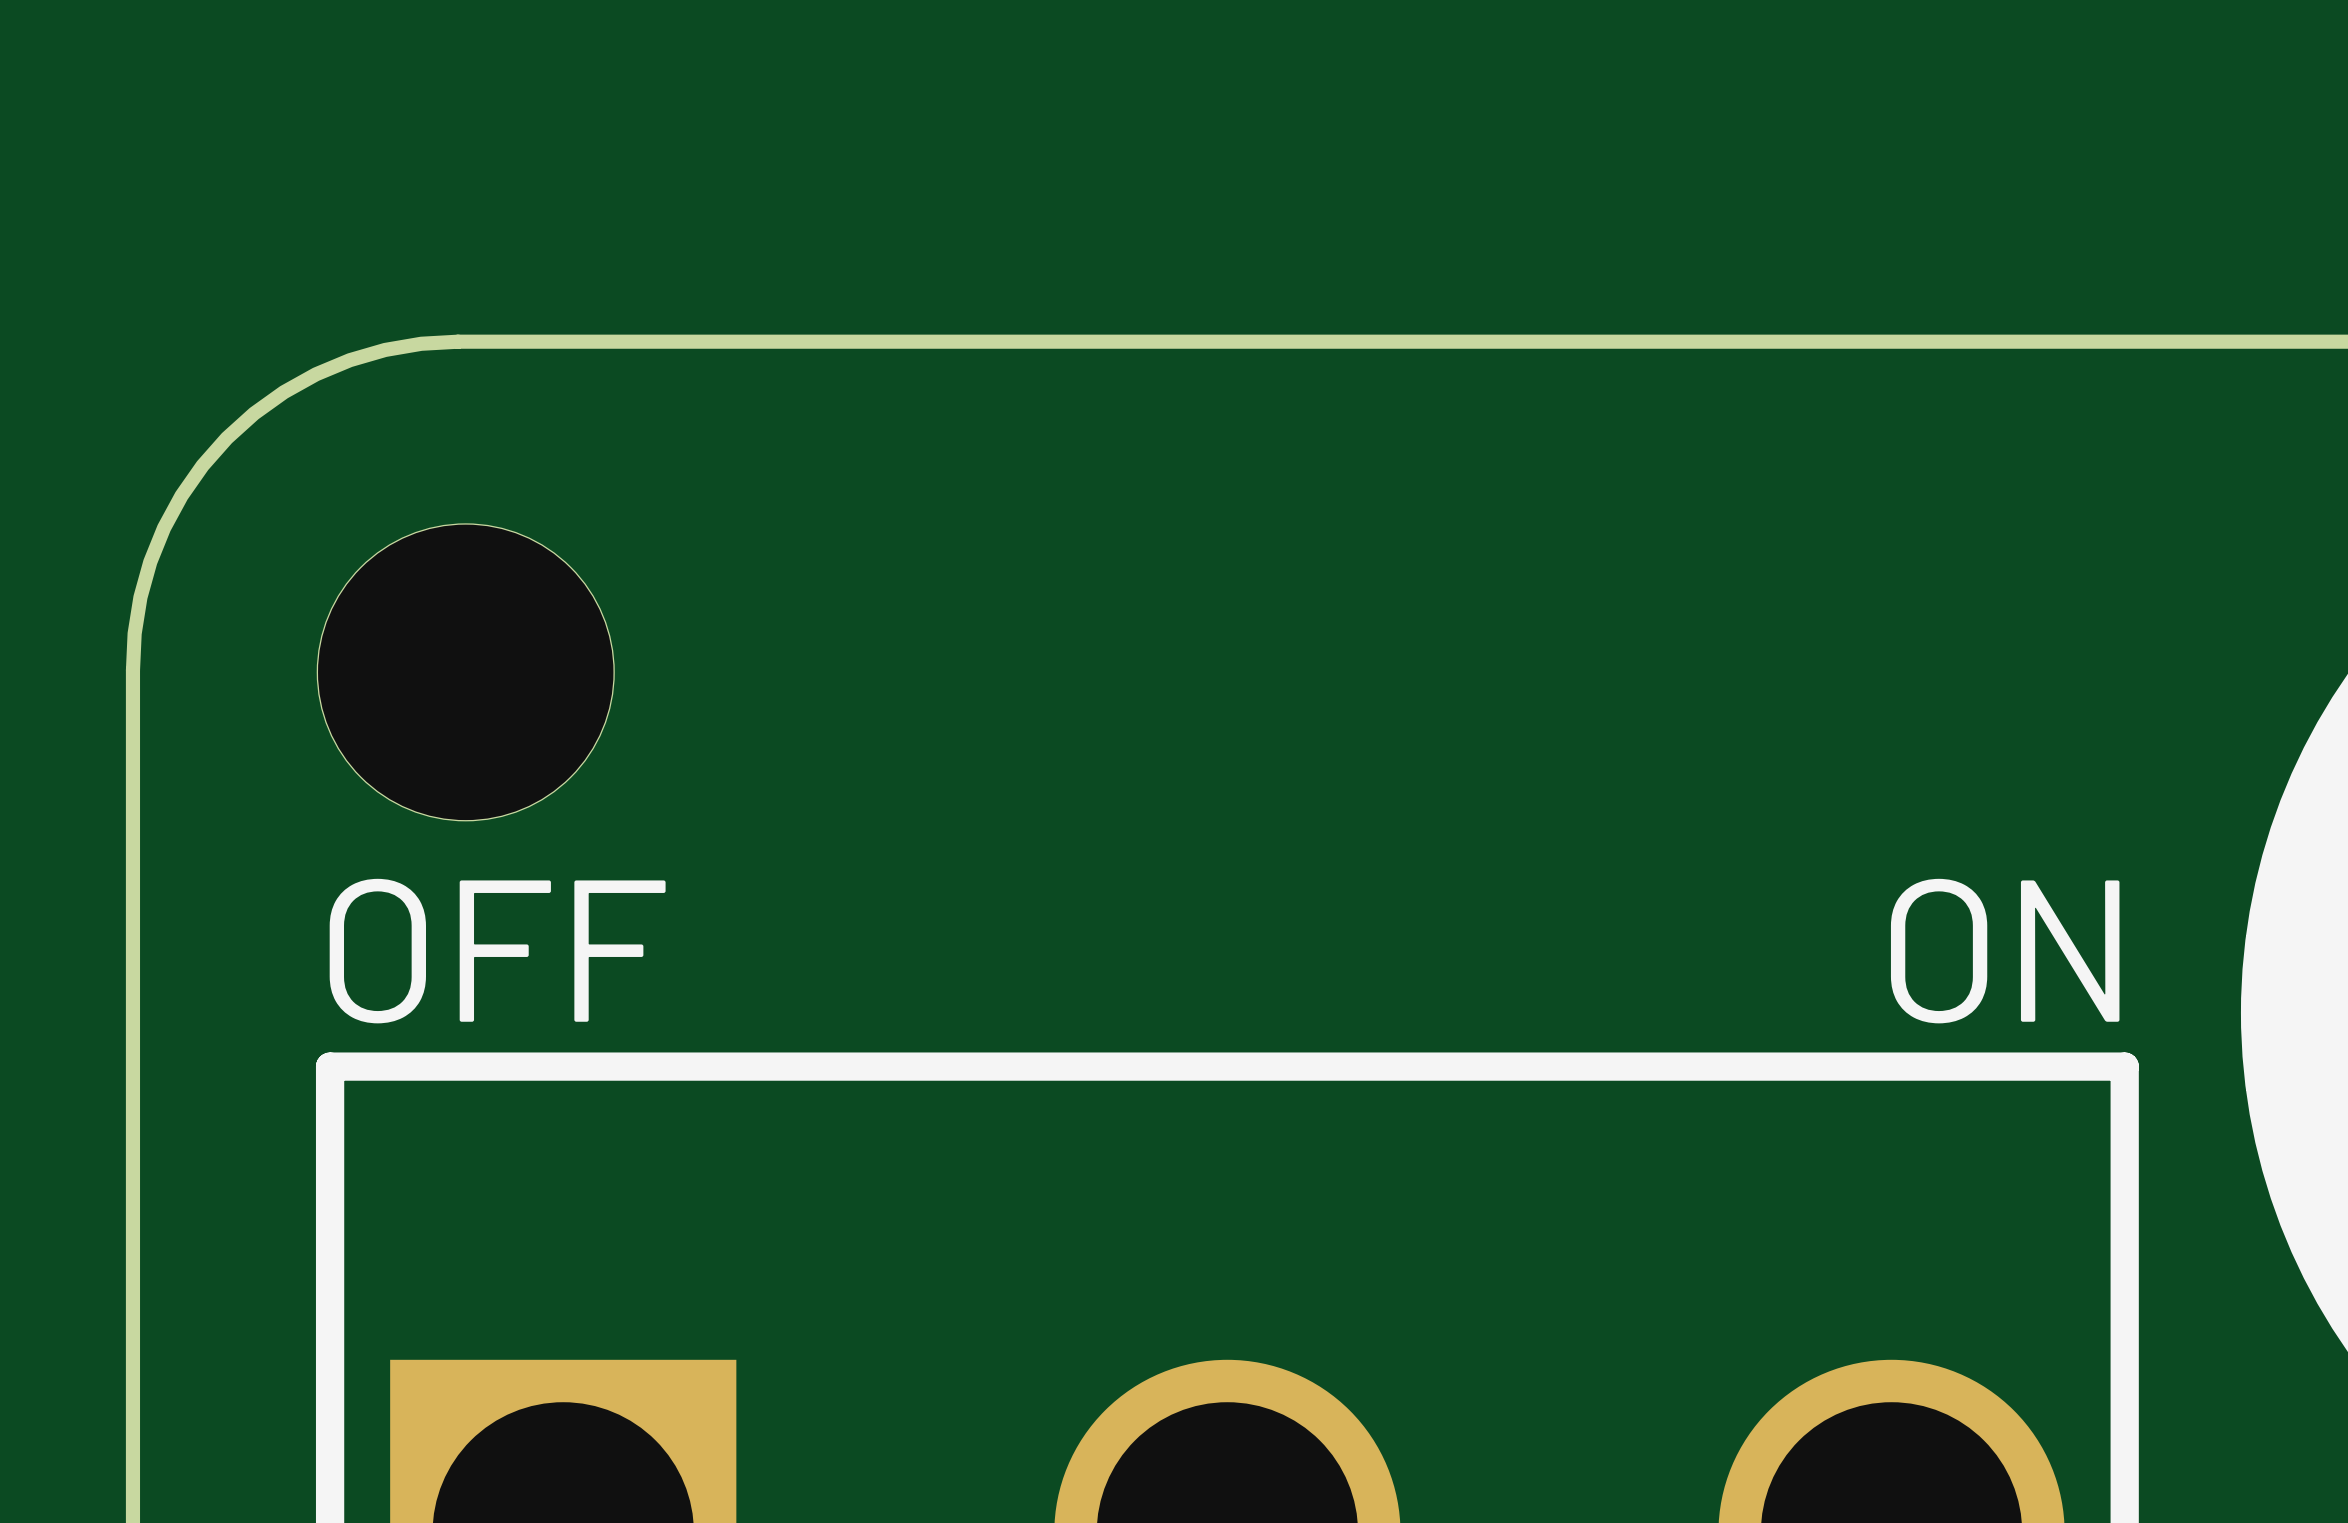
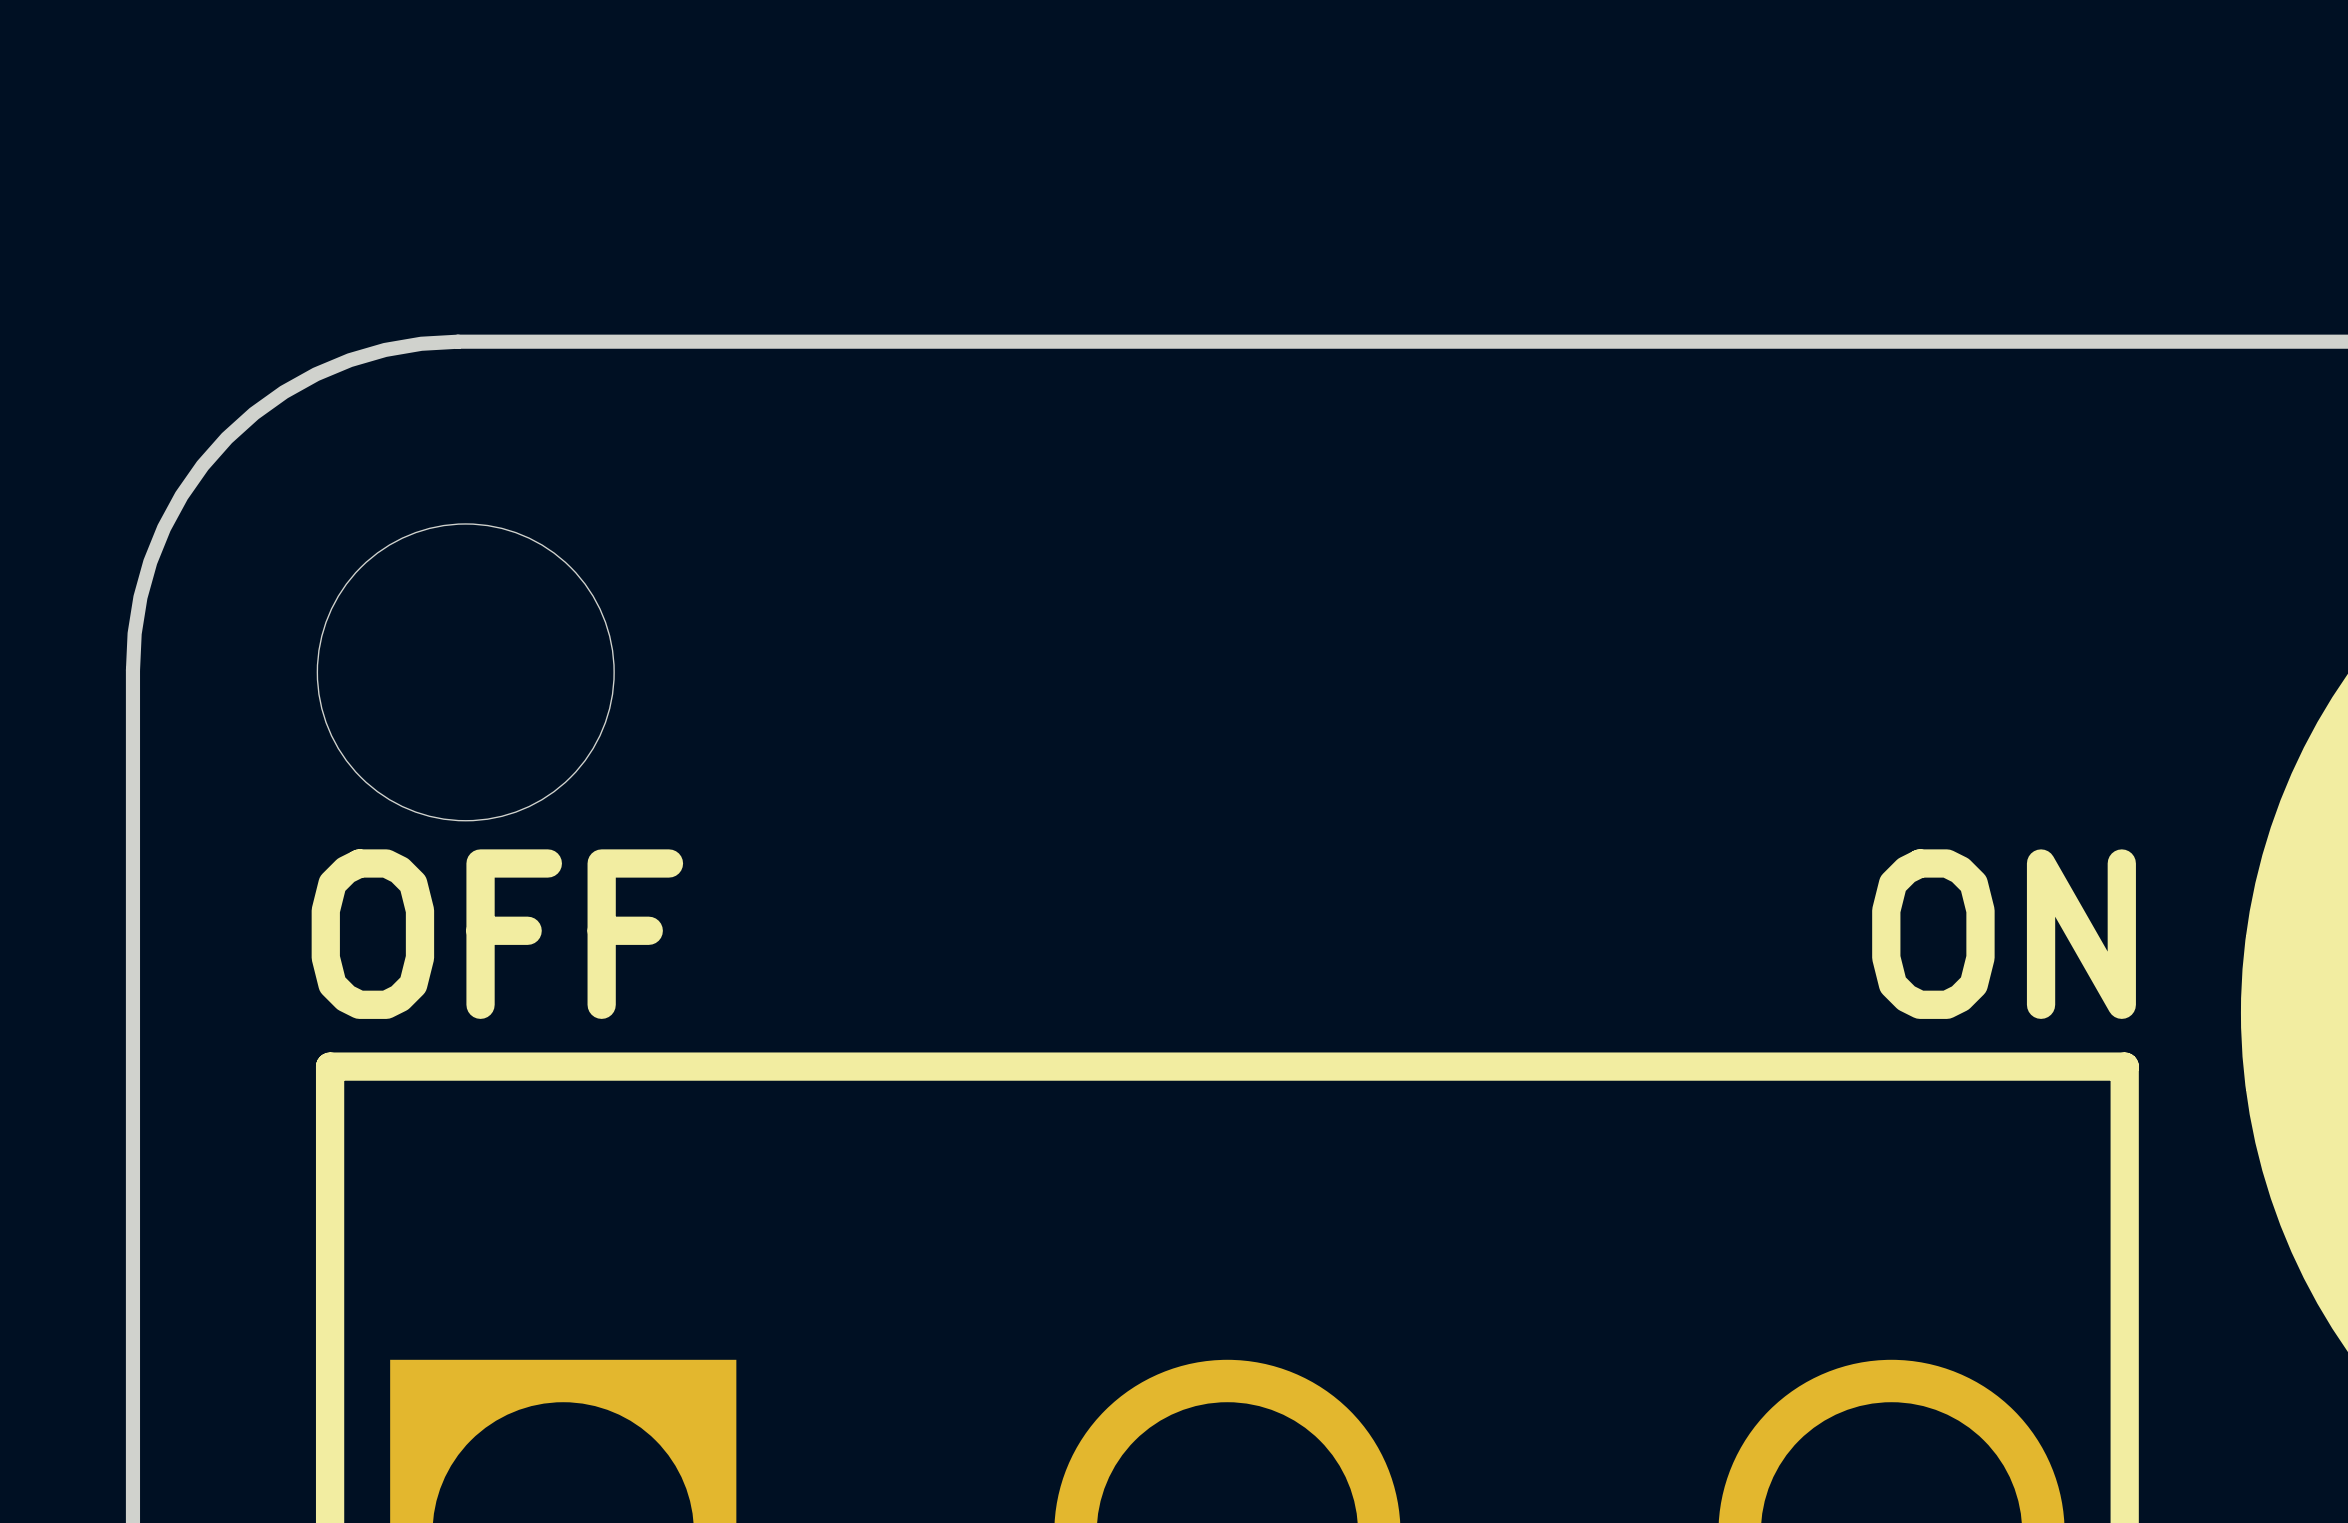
text position: OFF (497, 951) -> OFF (497, 934)
text position: ON (2005, 951) -> ON (2004, 934)

